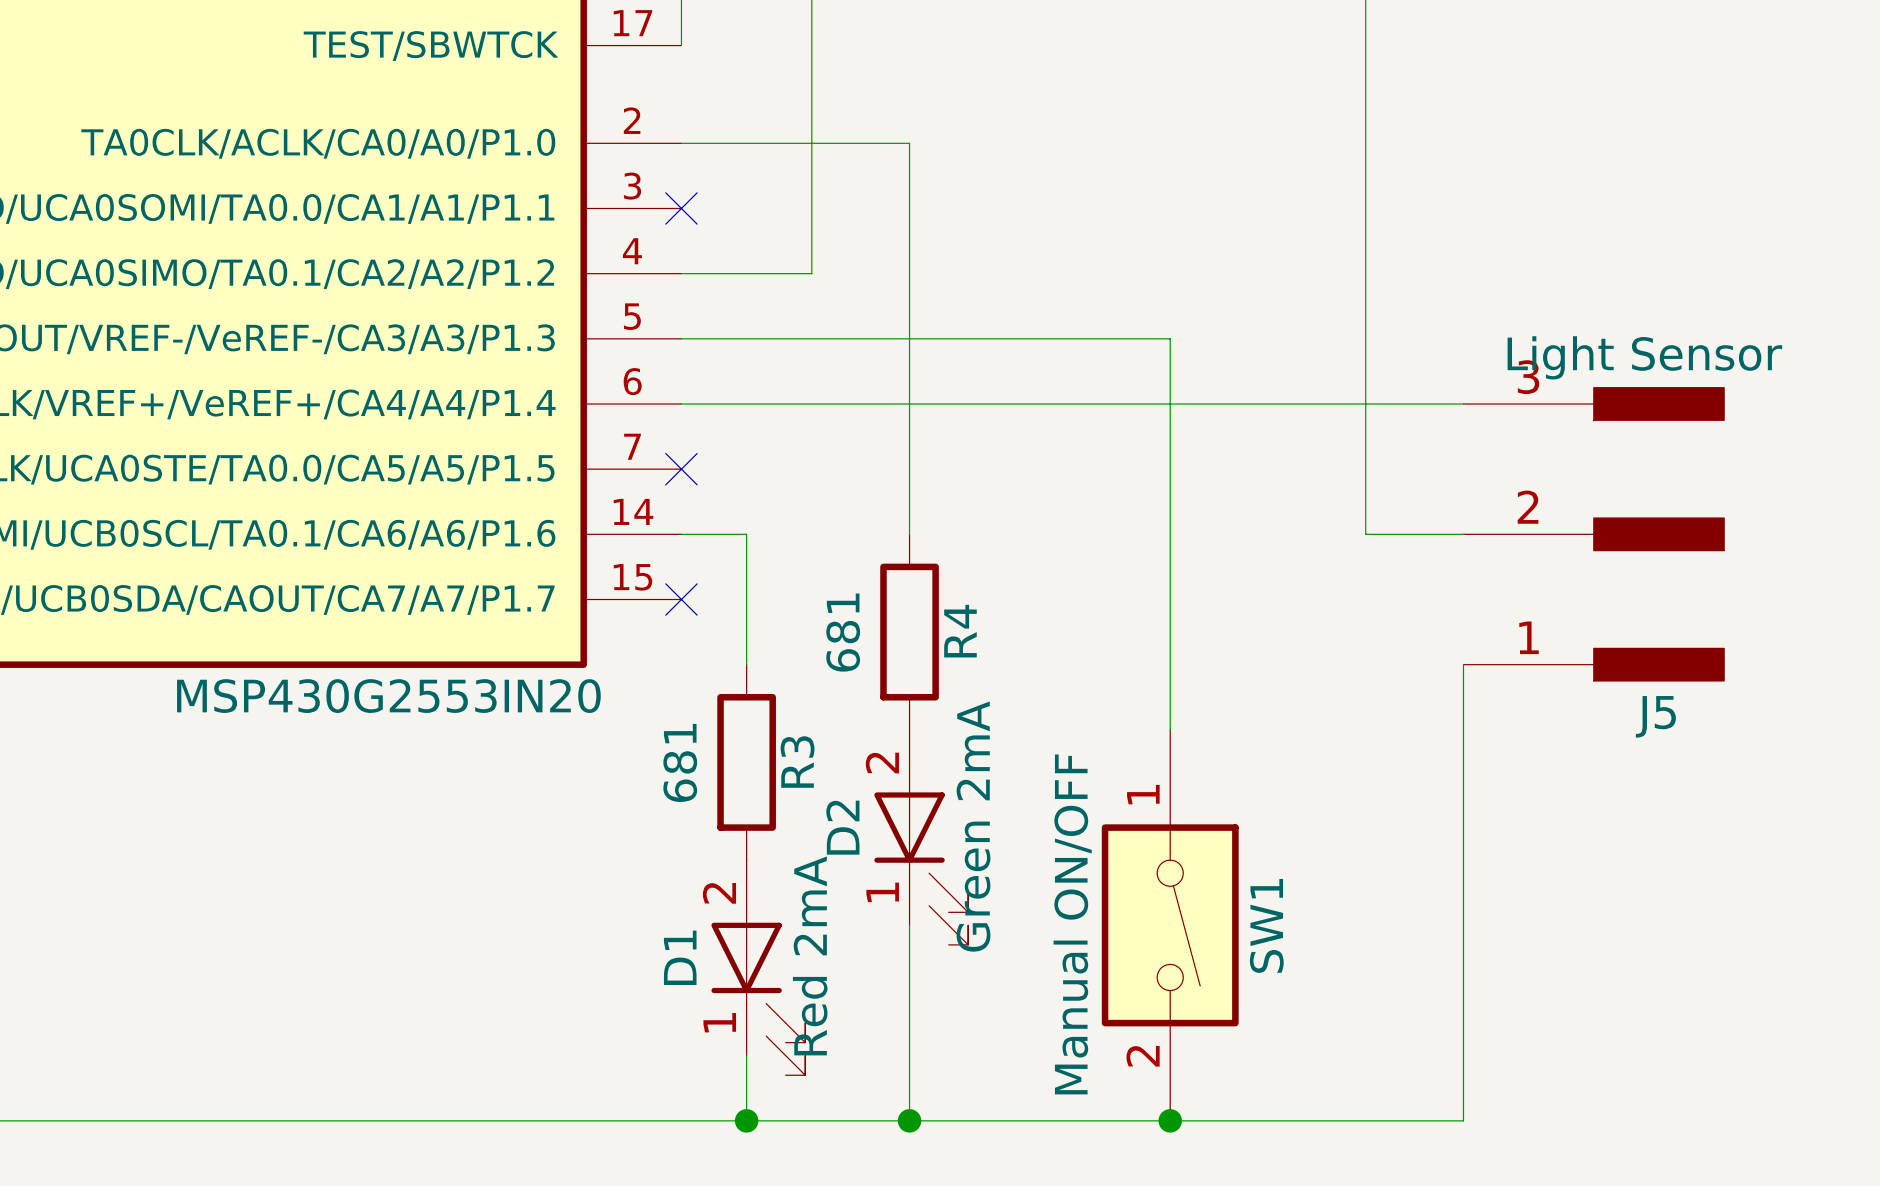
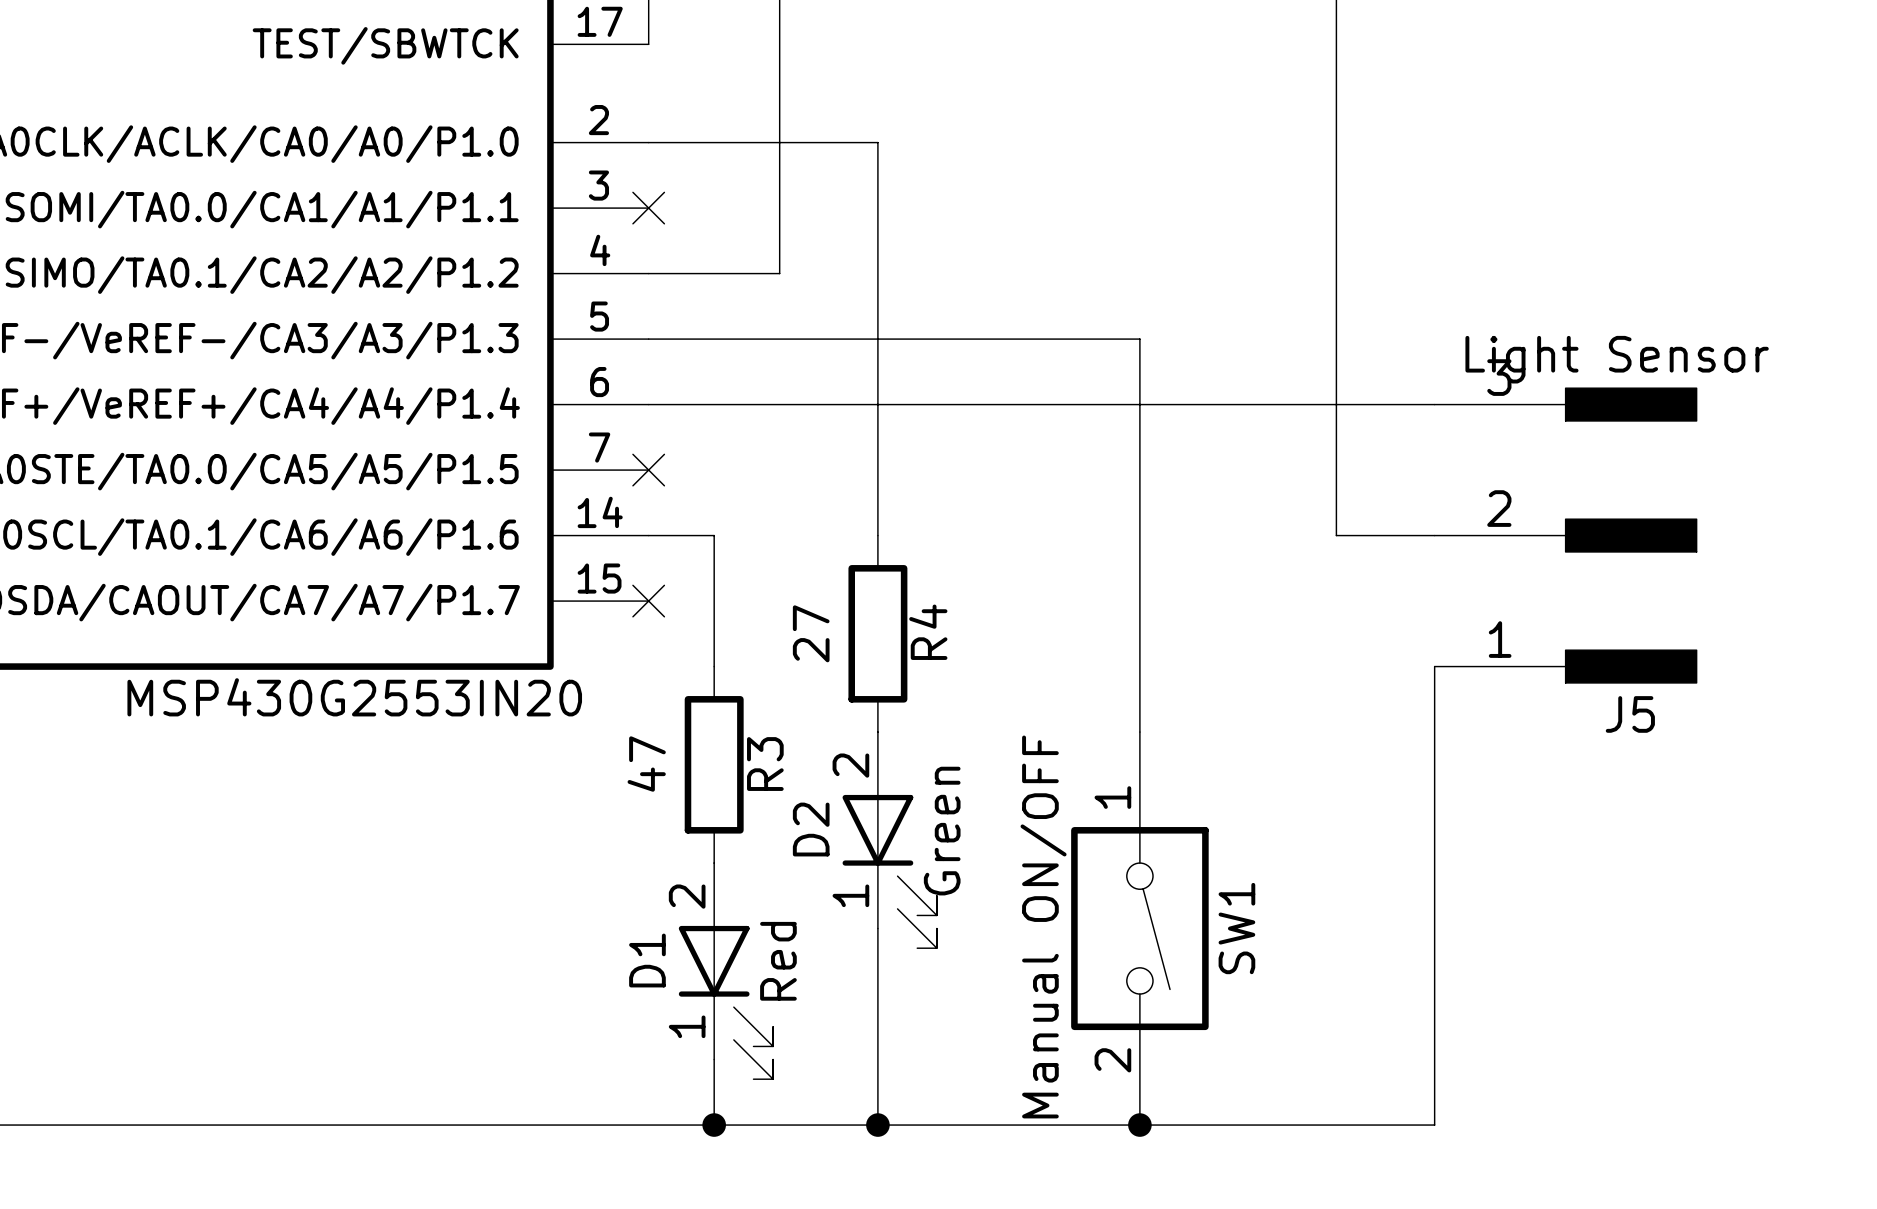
R4 value: 681 (843, 632) -> 27 (811, 633)
R3 value: 681 (680, 762) -> 47 (646, 764)
D2 value: Green 2mA (973, 826) -> Green (942, 831)
D1 value: Red 2mA (810, 955) -> Red (778, 961)

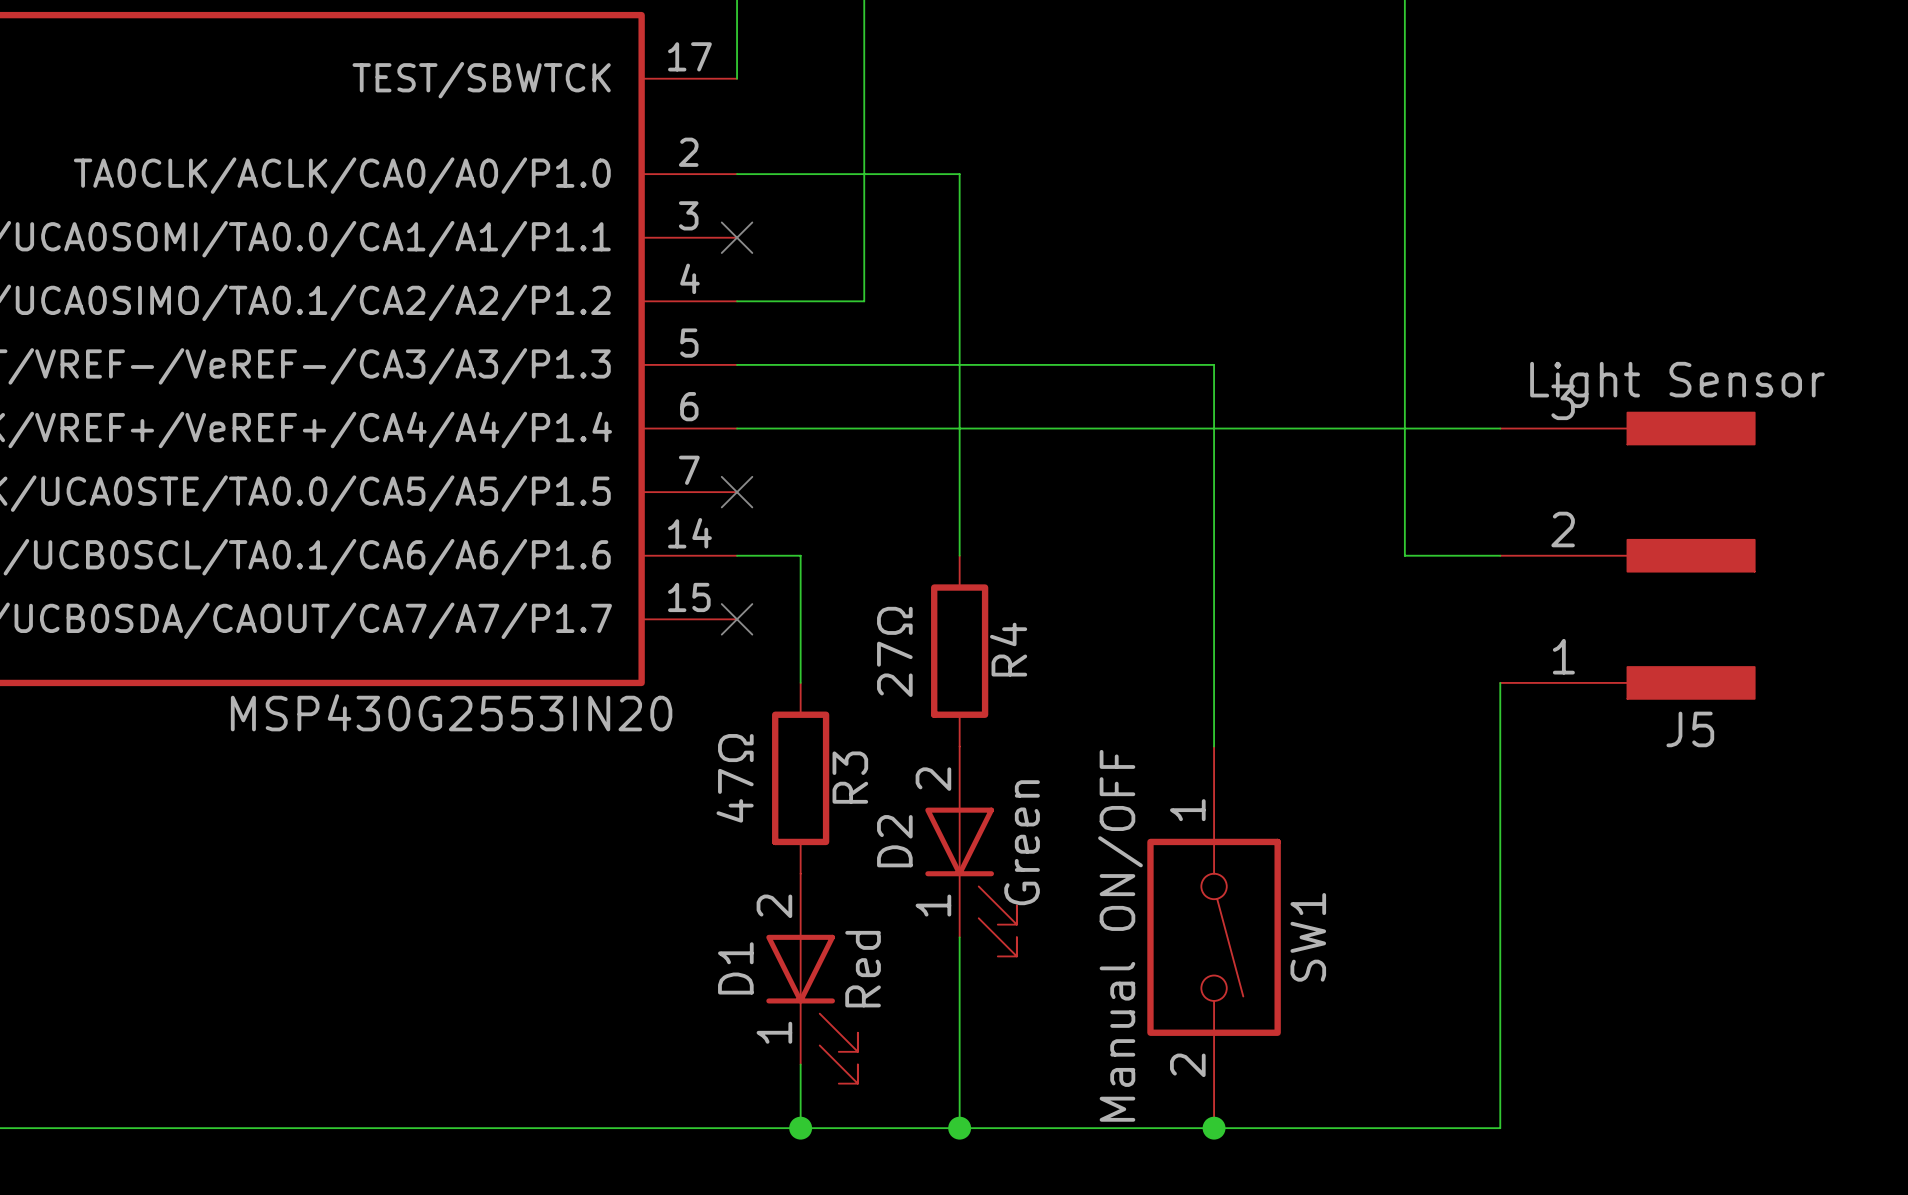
R4 value: 27 (811, 633) -> 27Ω (894, 651)
R3 value: 47 (646, 764) -> 47Ω (735, 778)

